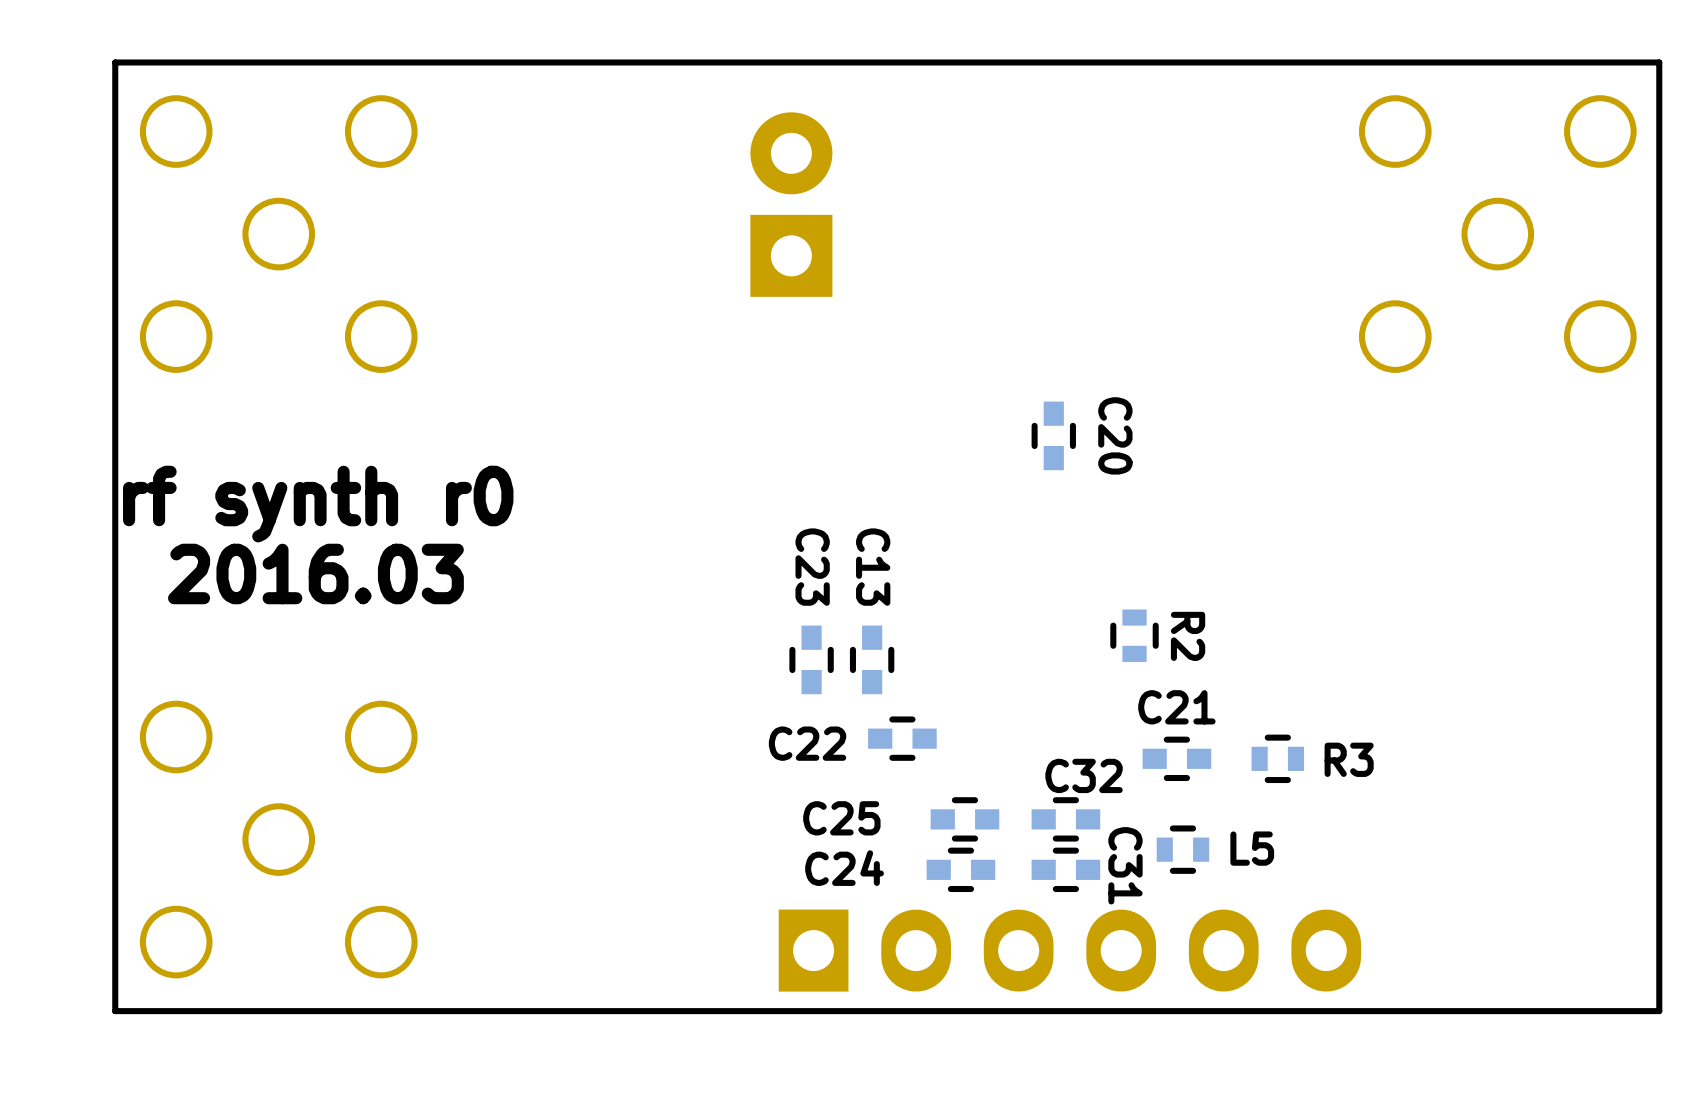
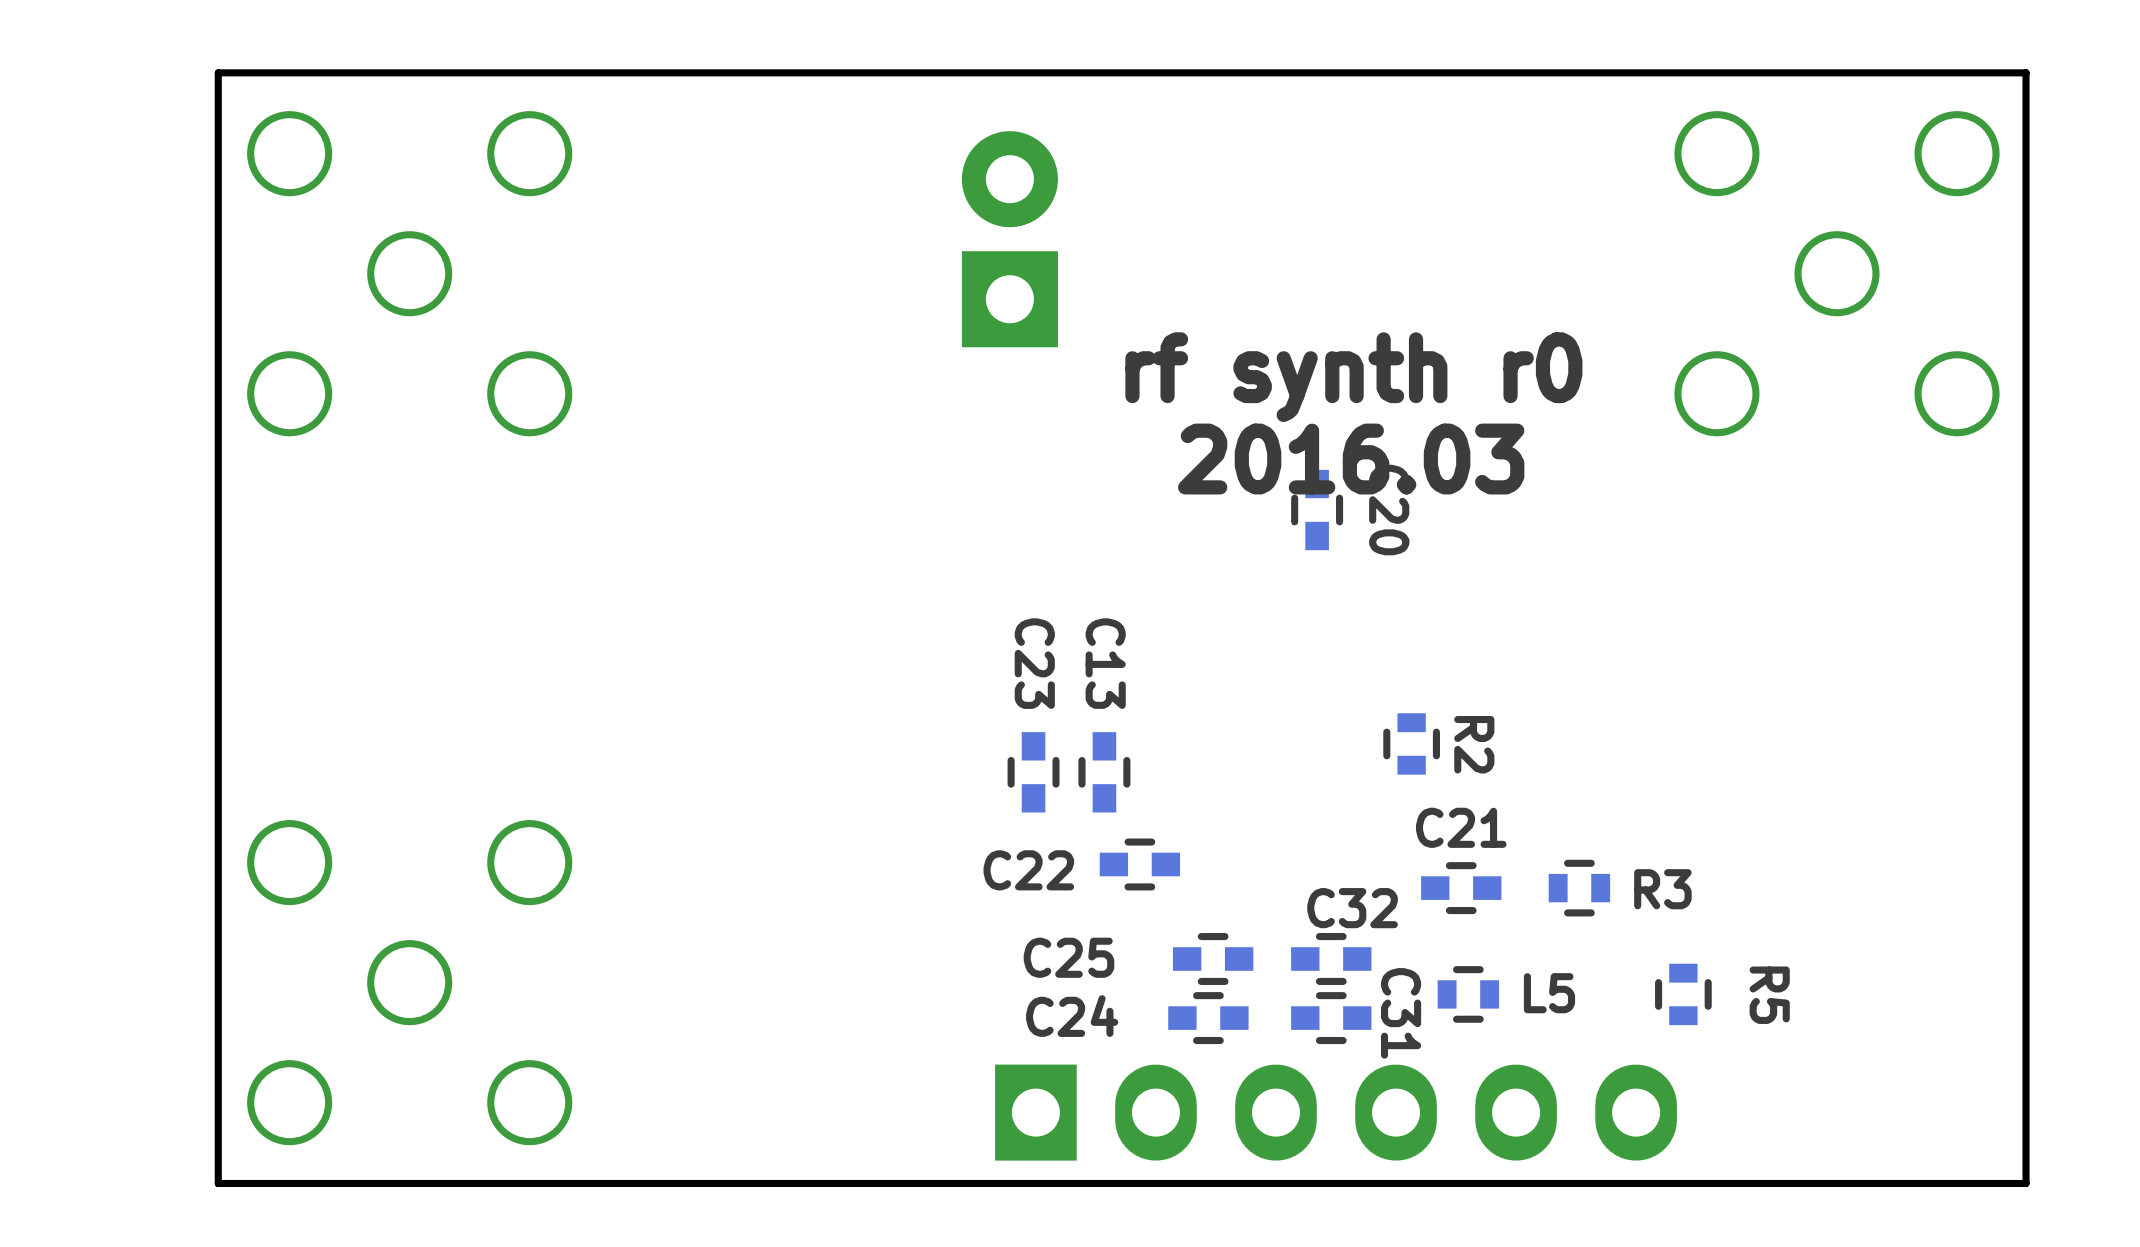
text position: rf synth r0 (318, 504) -> rf synth r0 (1353, 377)
text position: 2016.03 (315, 573) -> 2016.03 (1351, 459)
R5: none -> (1683, 994)

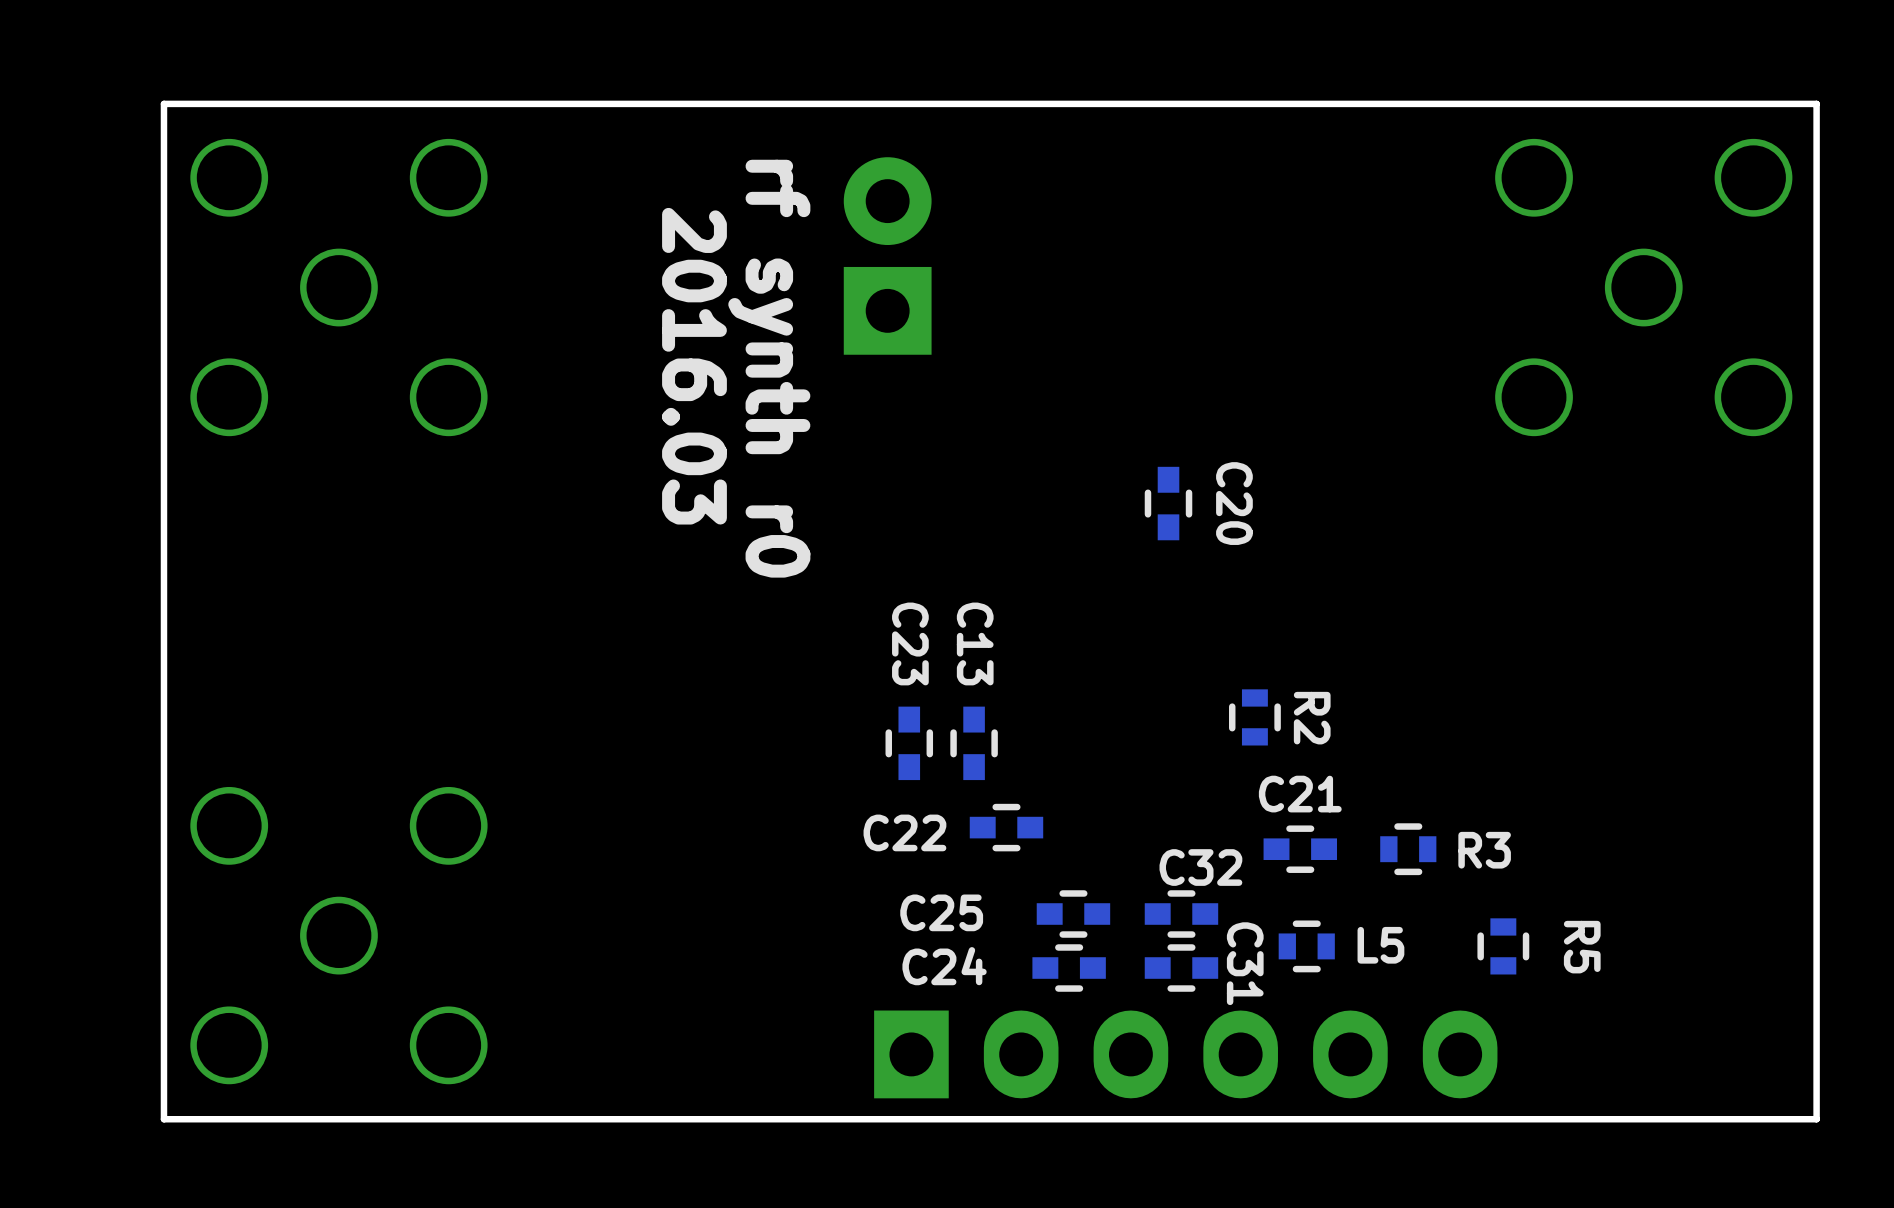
text rotation: 0° (1353, 377) -> 90° clockwise (769, 368)
text rotation: 0° (1351, 459) -> 90° clockwise (694, 366)
text position: 2016.03 (1351, 459) -> 2016.03 (694, 366)

